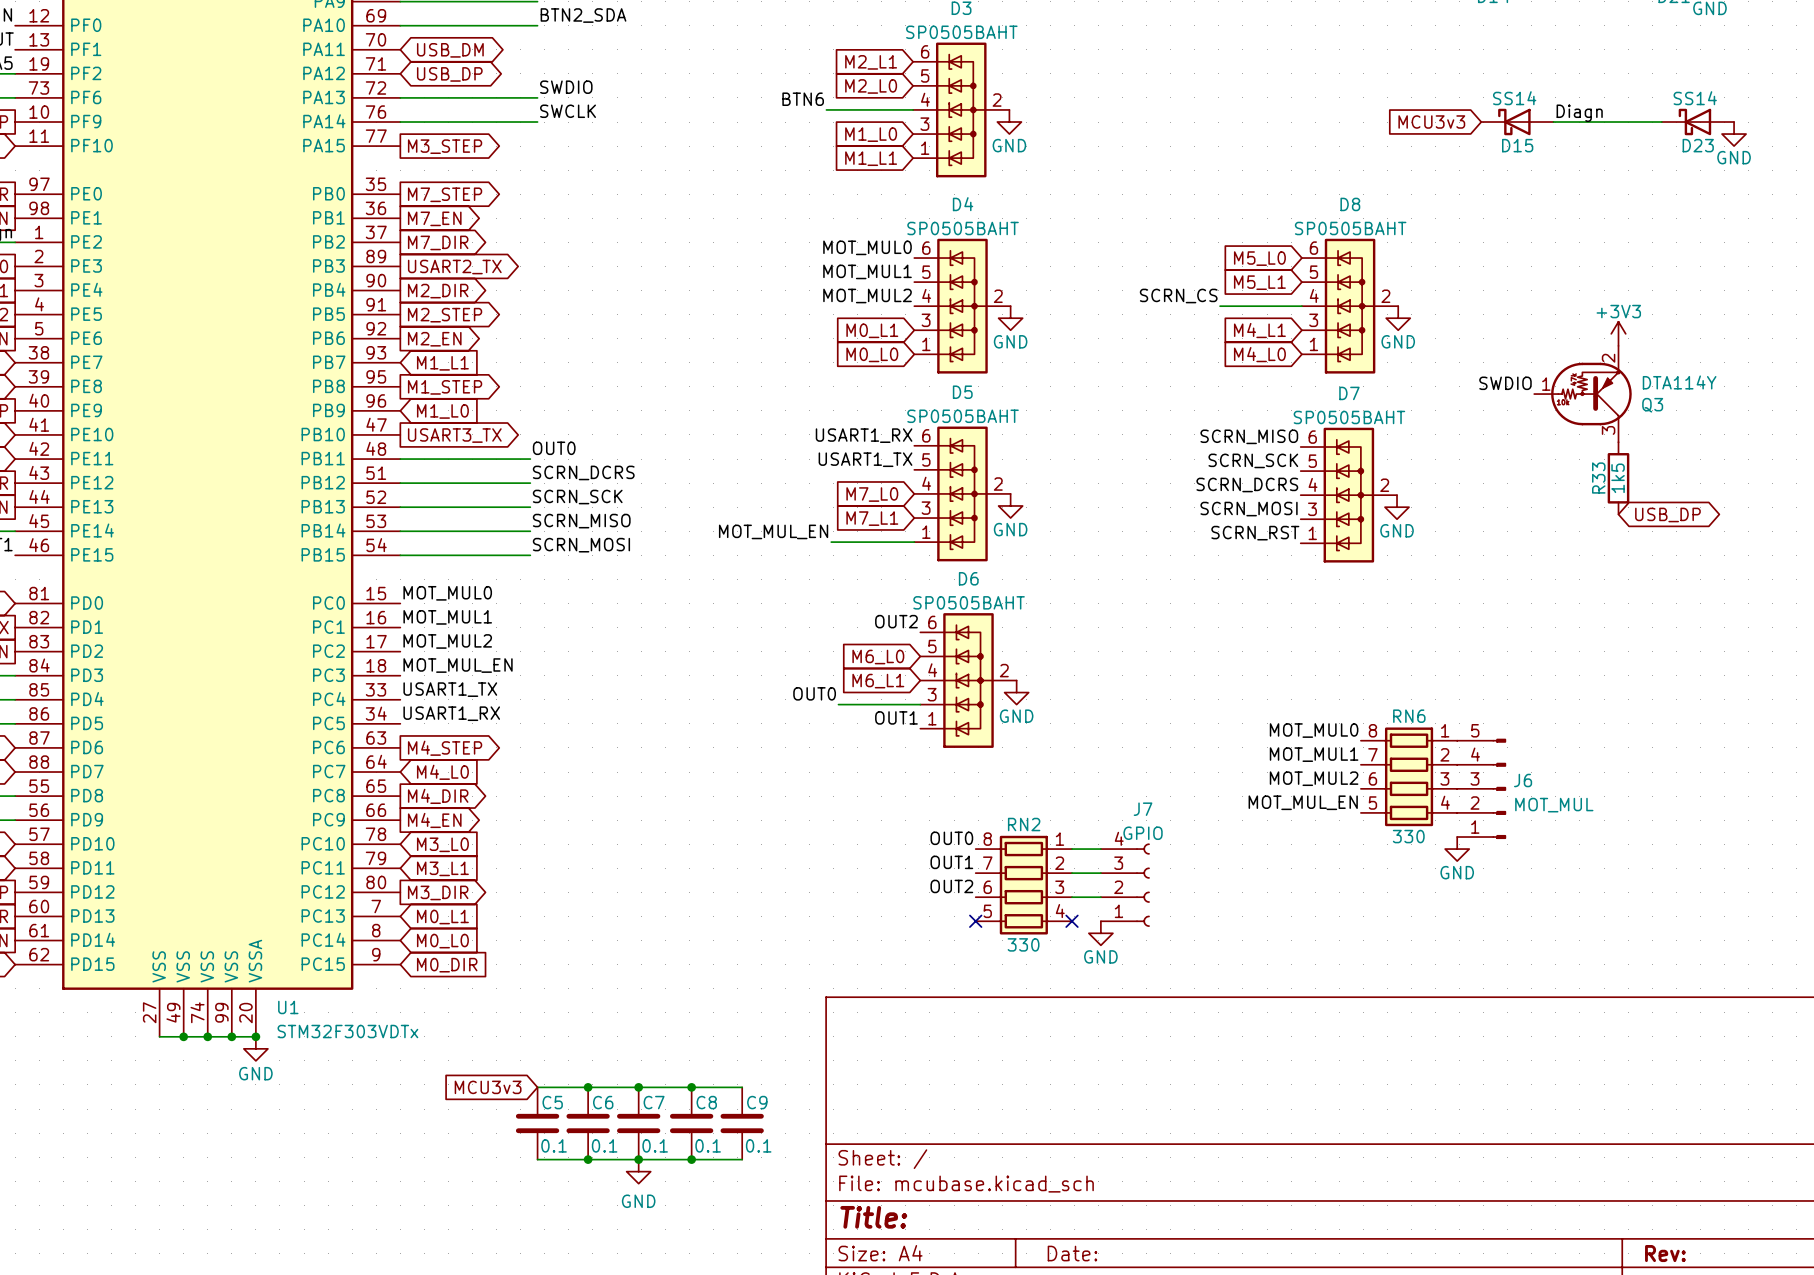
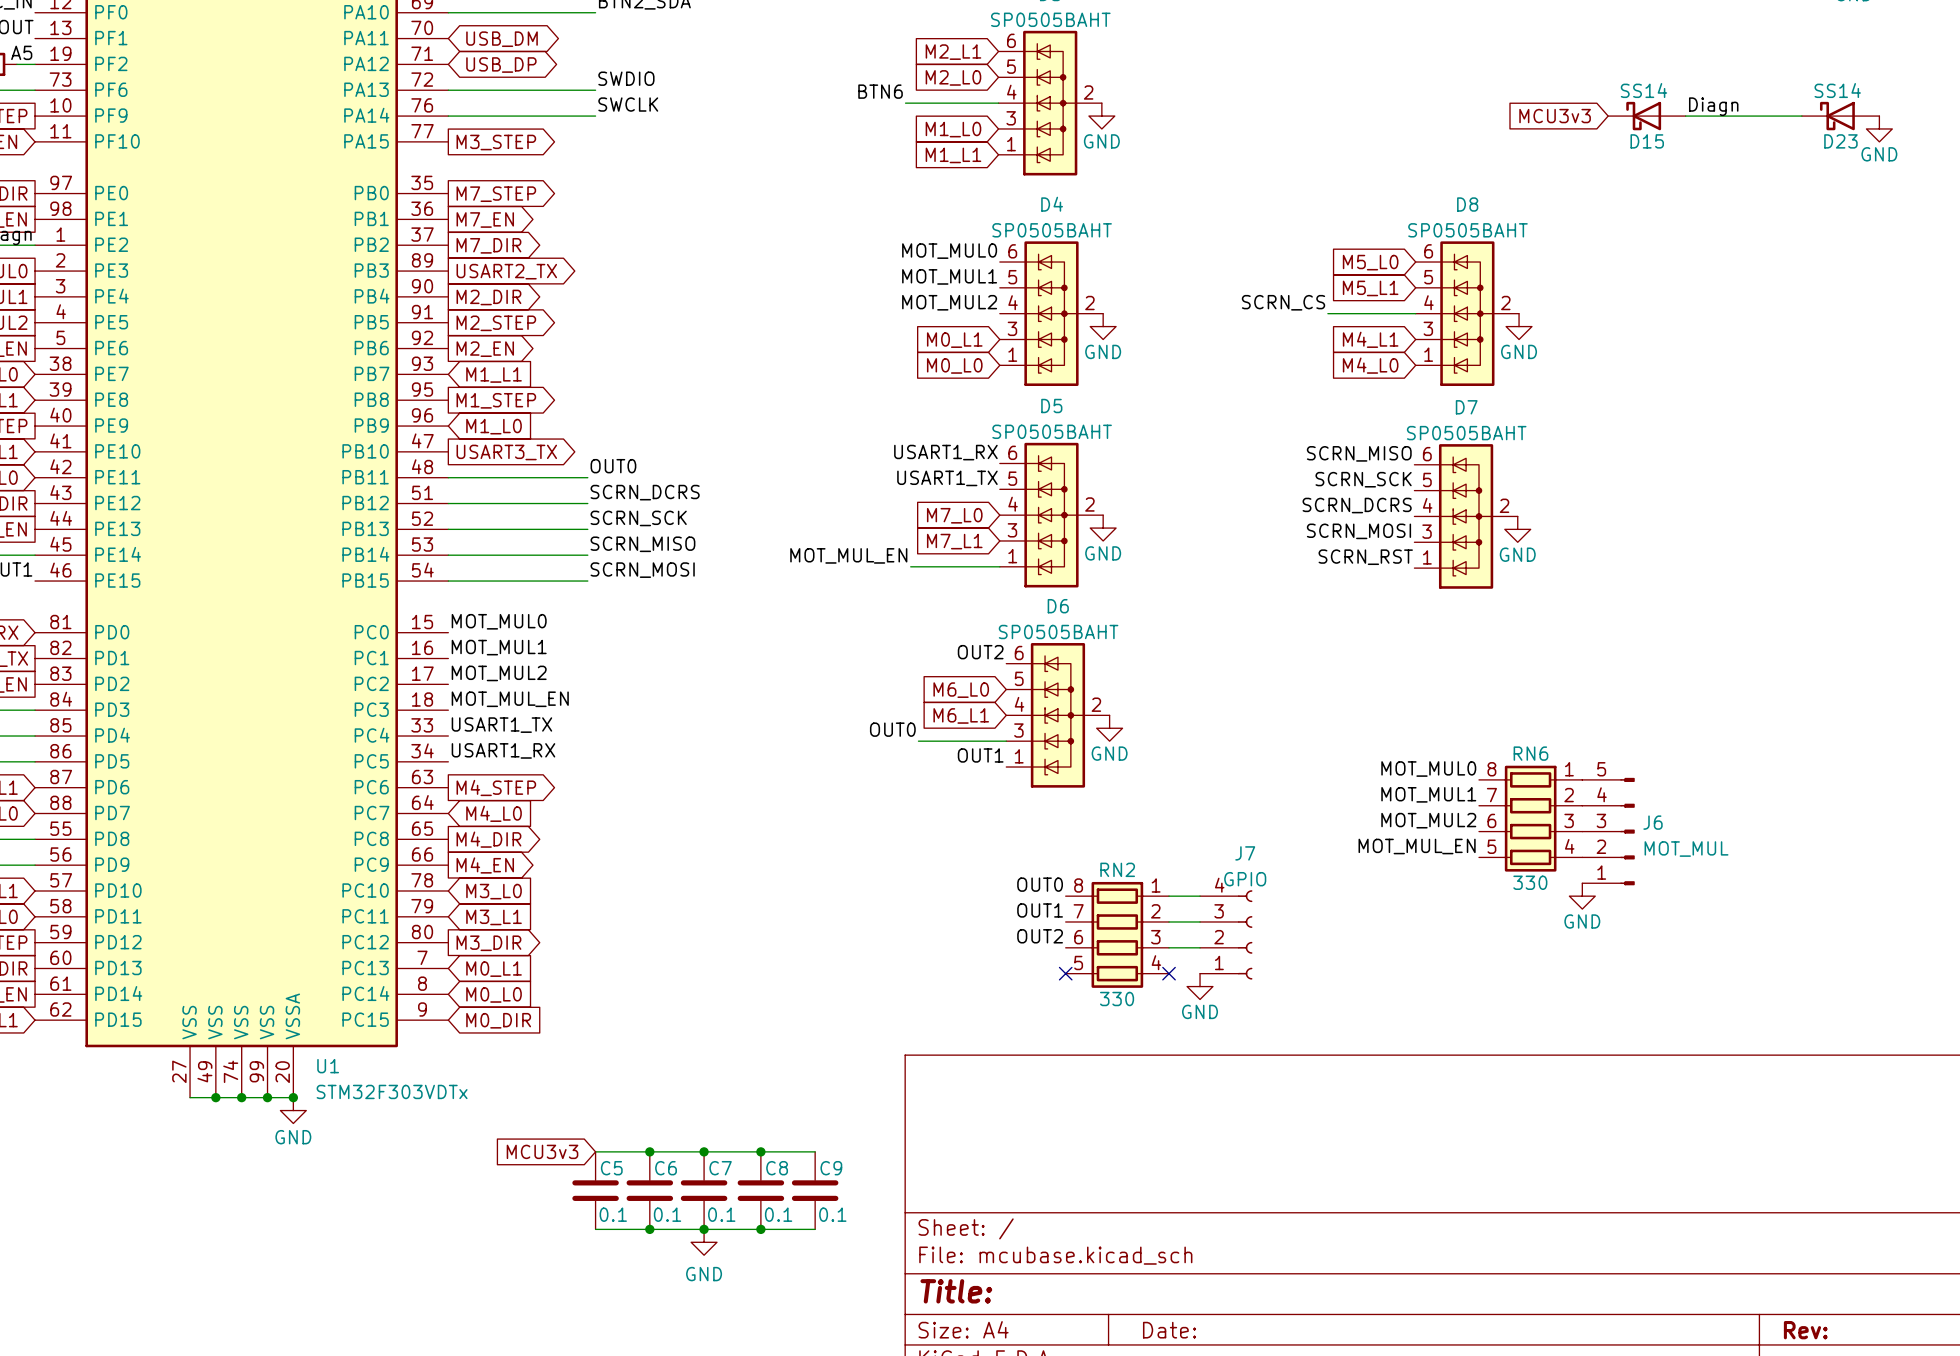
power symbol: +3V3 (1618, 333) -> none
label: SWDIO (1505, 383) -> none
Q3: DTA114Y (1582, 394) -> none
R33: 1k5 (1618, 478) -> none
global label: USB_DP (1667, 514) -> none

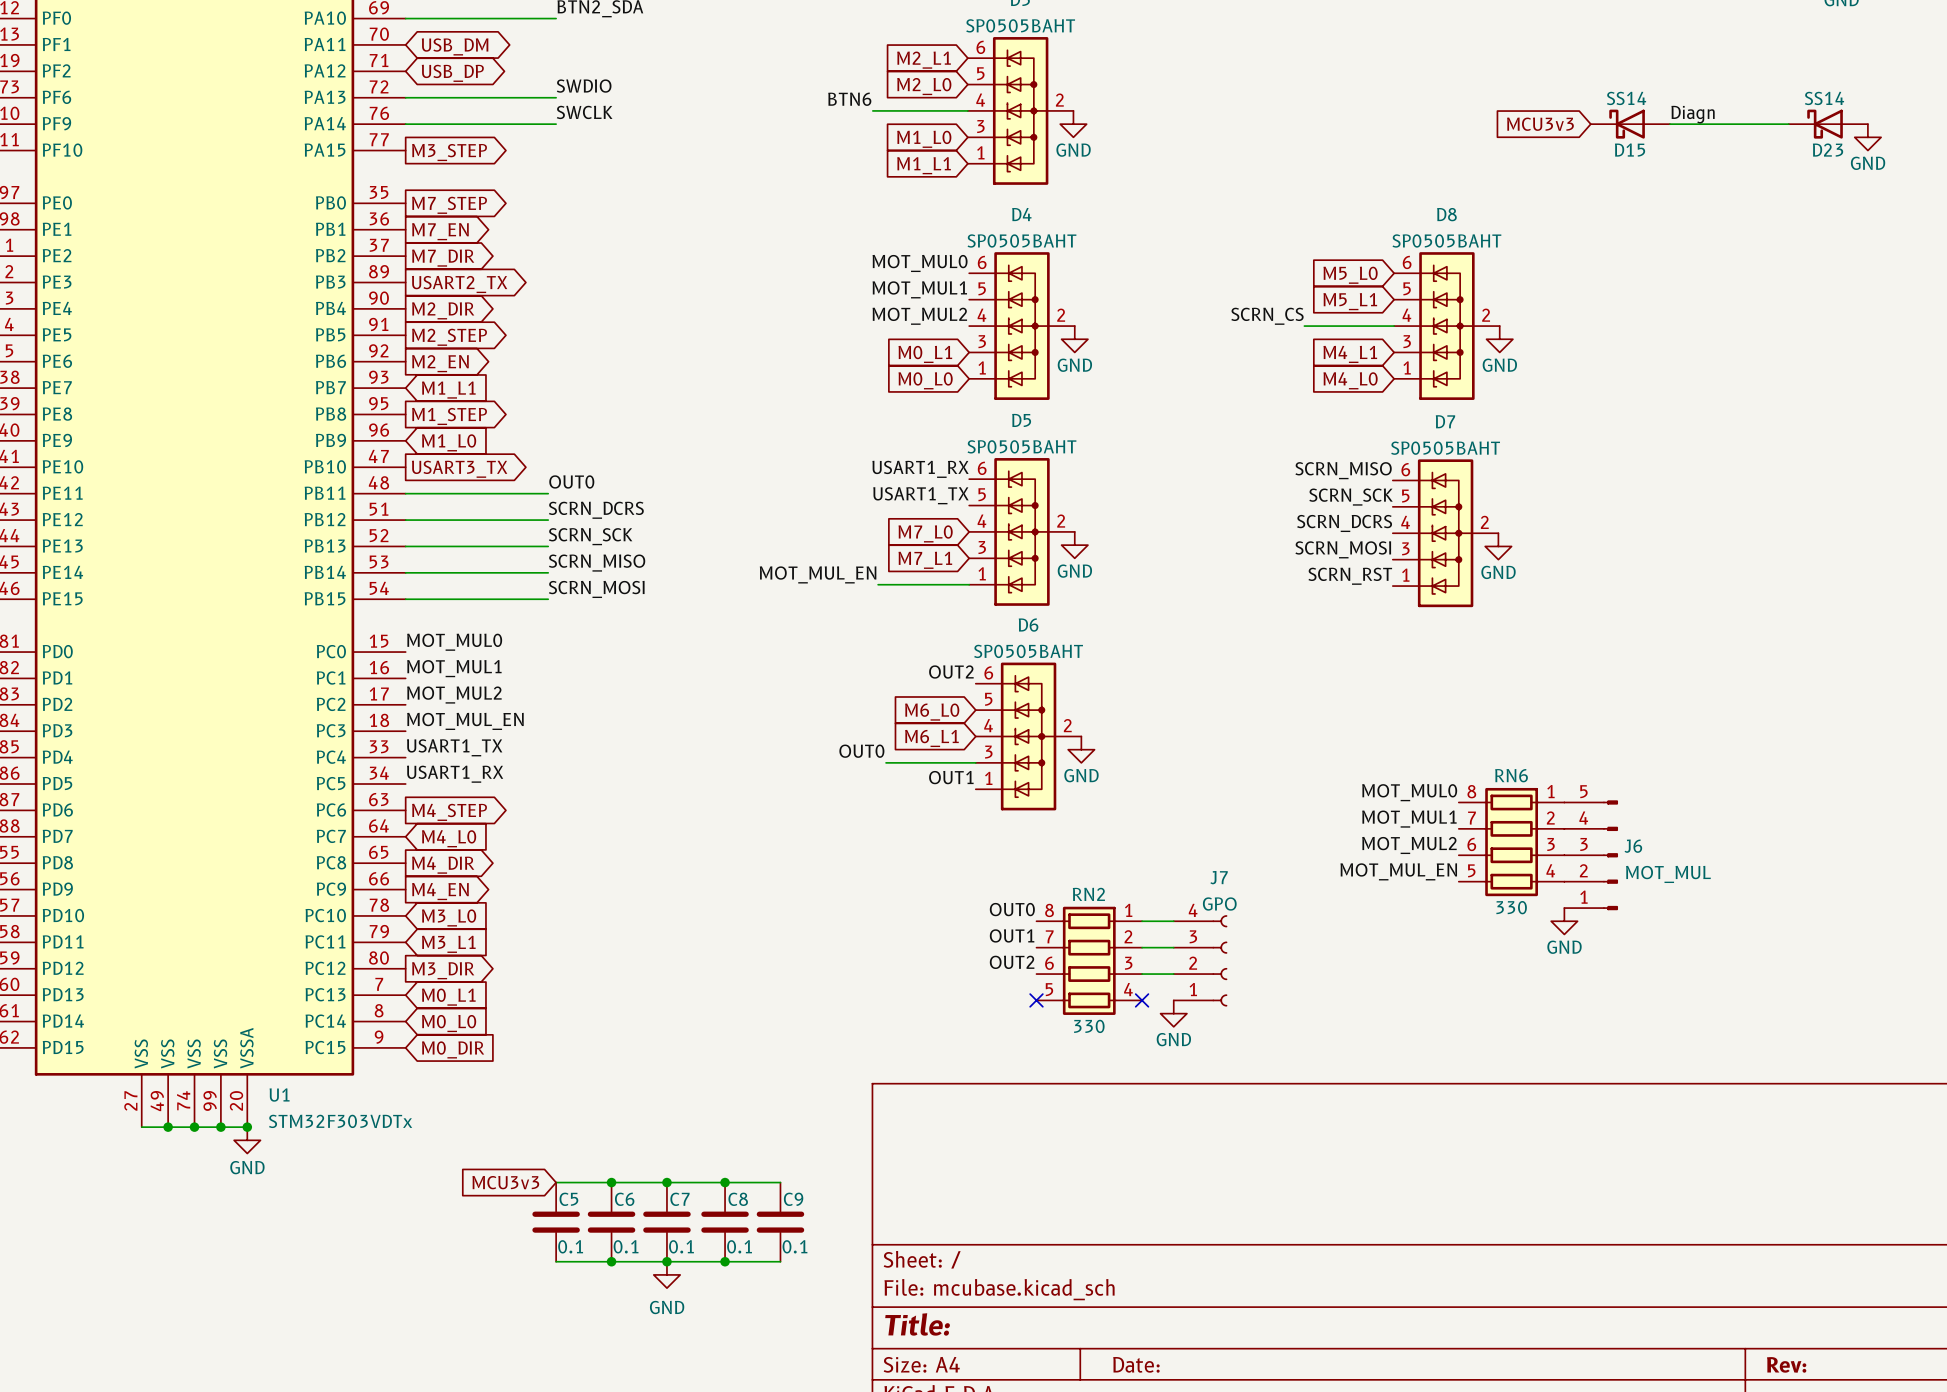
J7 value: GPIO (1245, 879) -> GPO (1219, 904)

